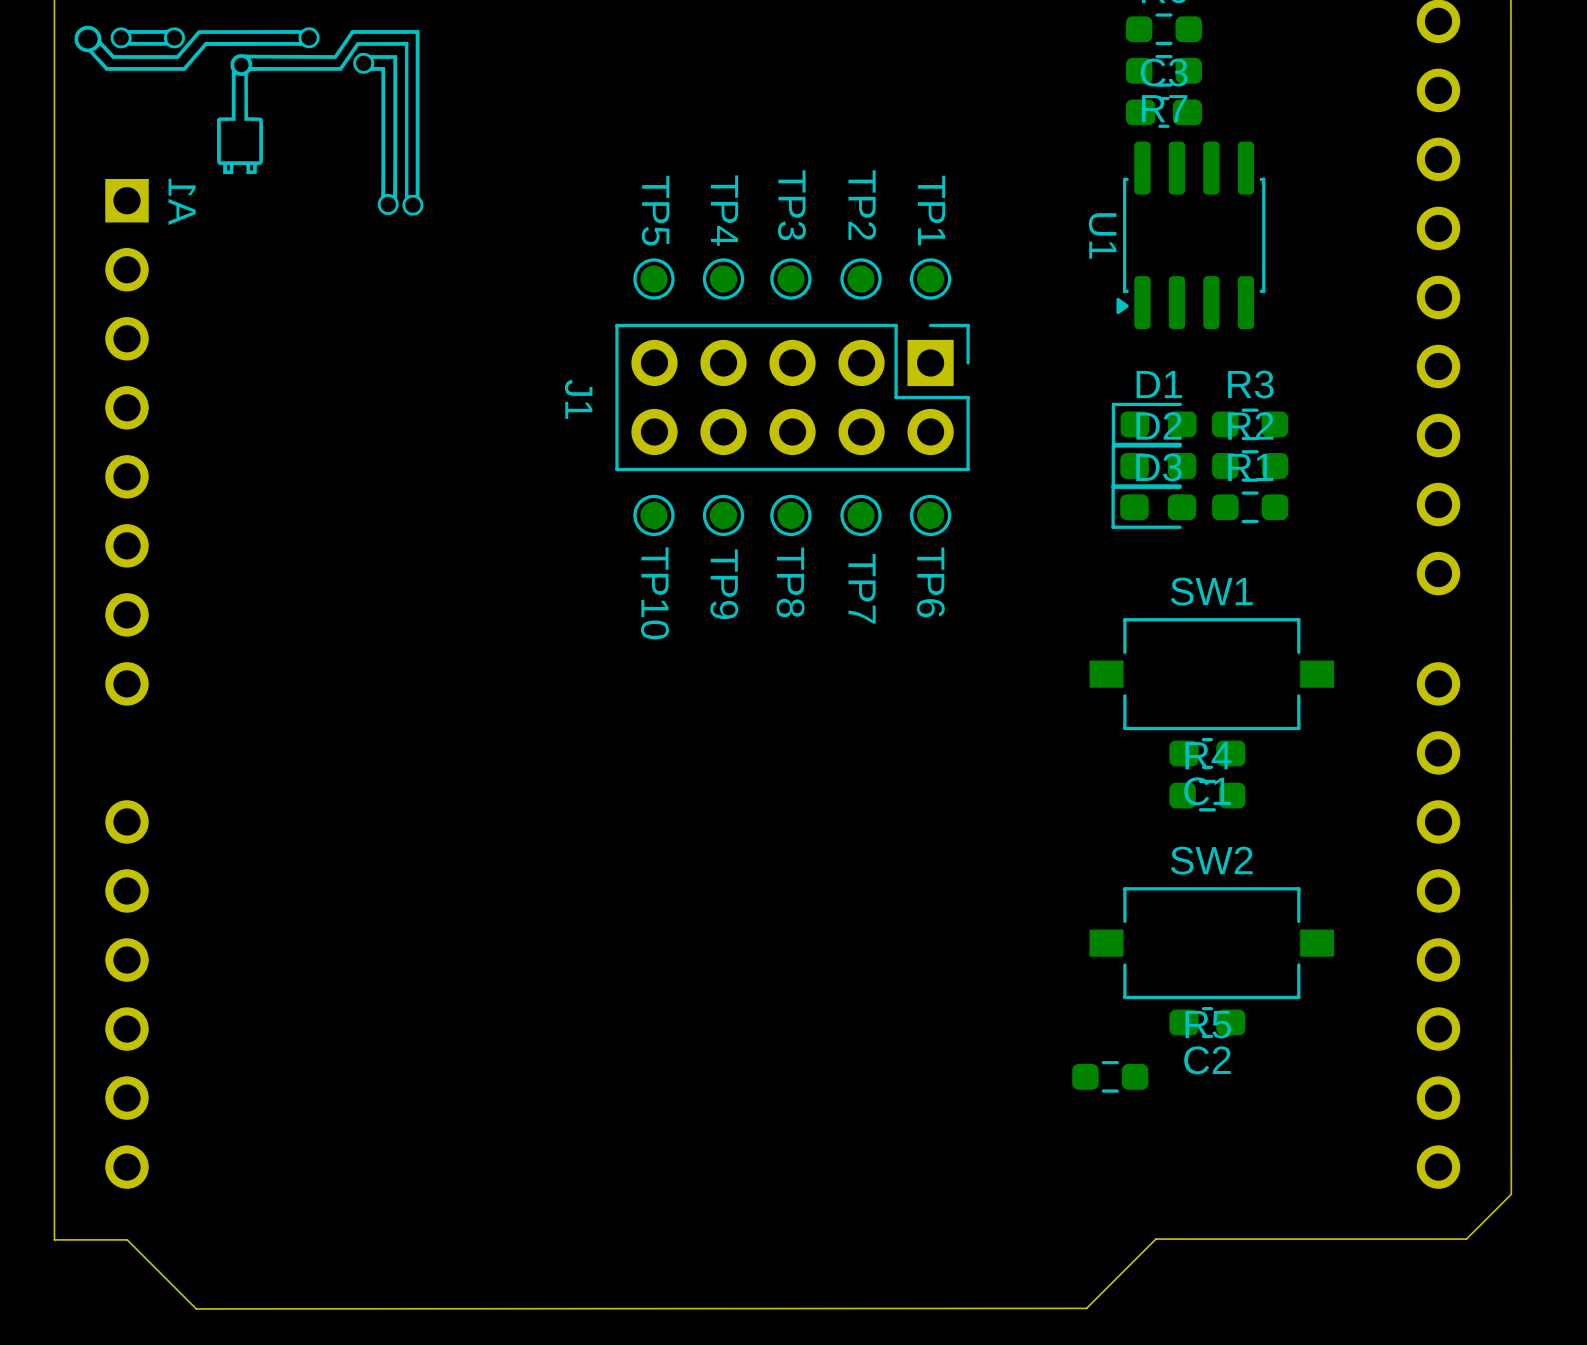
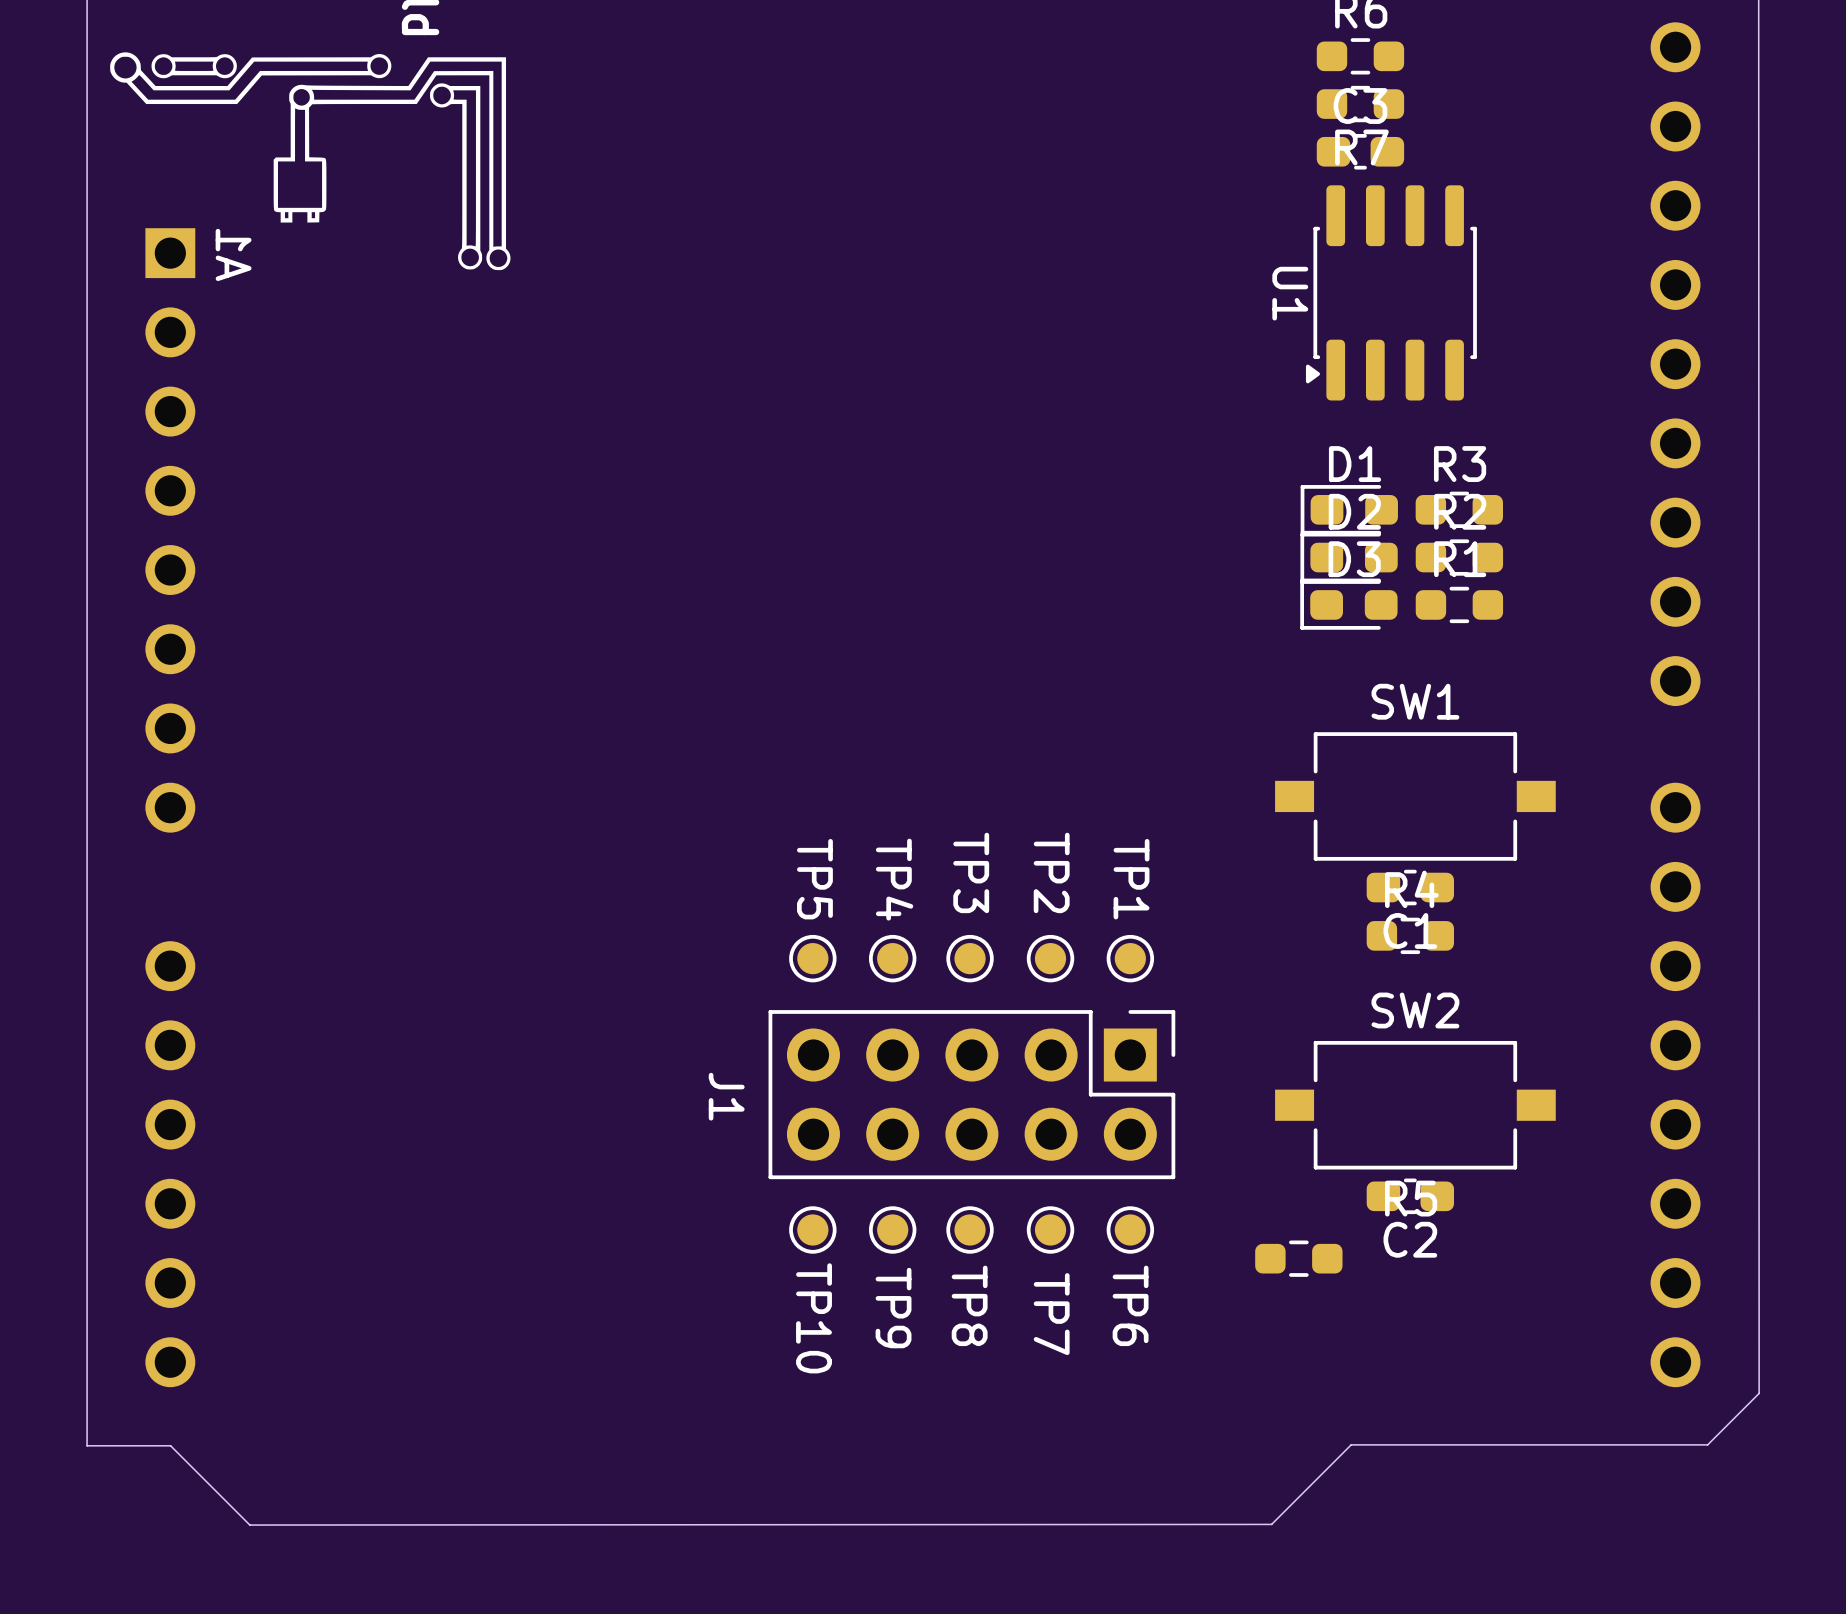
TP5 position: (653, 278) -> (812, 958)
TP4 position: (723, 278) -> (892, 958)
TP3 position: (790, 278) -> (970, 958)
TP2 position: (861, 278) -> (1050, 958)
TP1 position: (930, 278) -> (1130, 958)
J1 position: (792, 397) -> (971, 1094)
TP10 position: (653, 515) -> (812, 1229)
TP9 position: (723, 515) -> (892, 1229)
TP8 position: (790, 515) -> (970, 1229)
TP7 position: (861, 515) -> (1050, 1229)
TP6 position: (930, 515) -> (1130, 1229)

